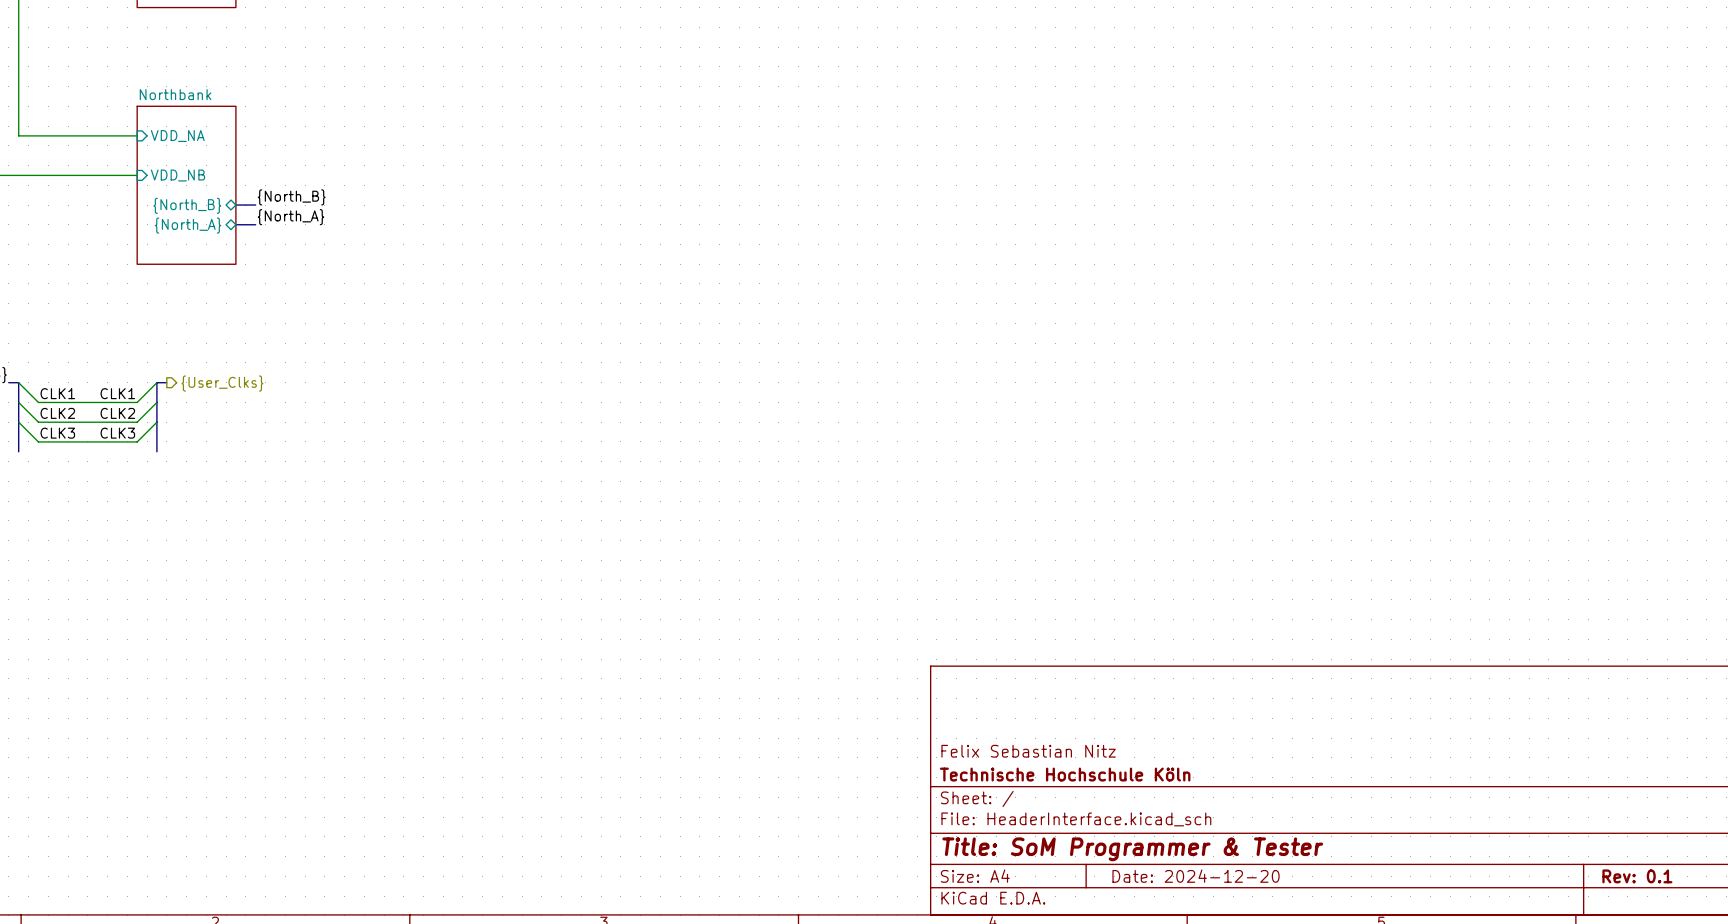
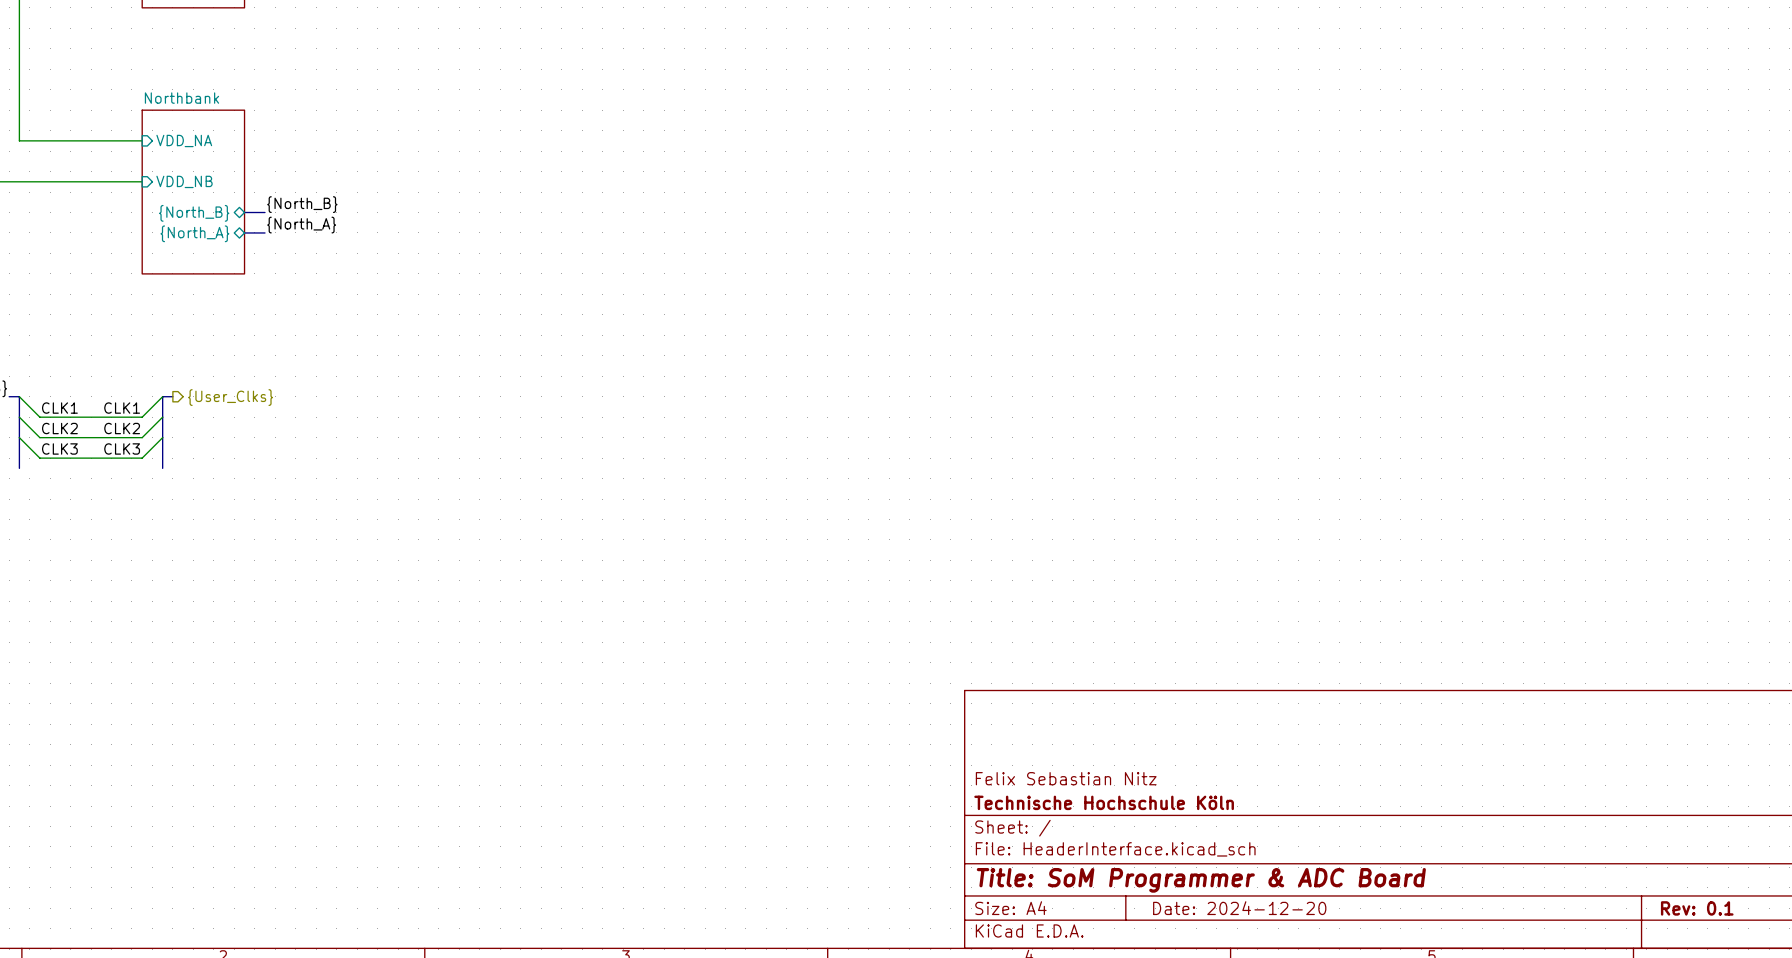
title block: Title: SoM Programmer & Tester (1132, 849) -> Title: SoM Programmer & ADC Board (1201, 880)

